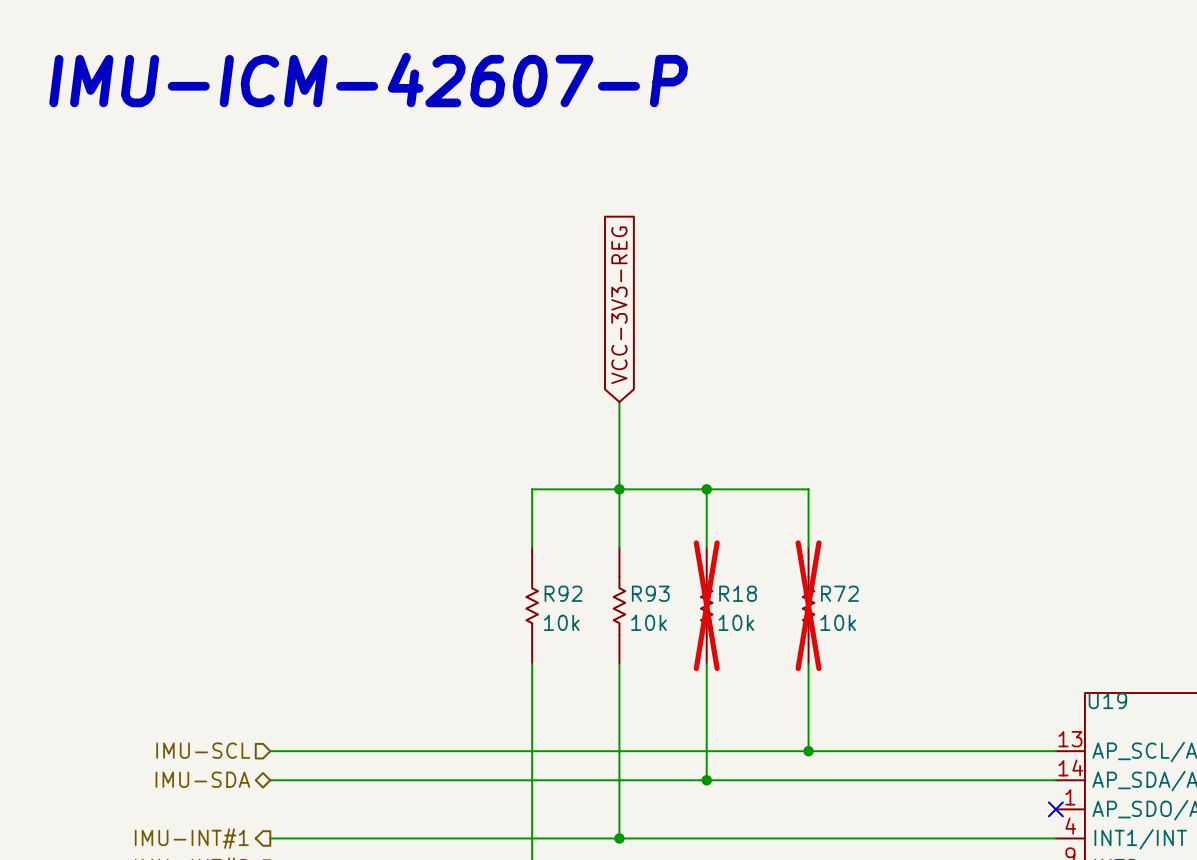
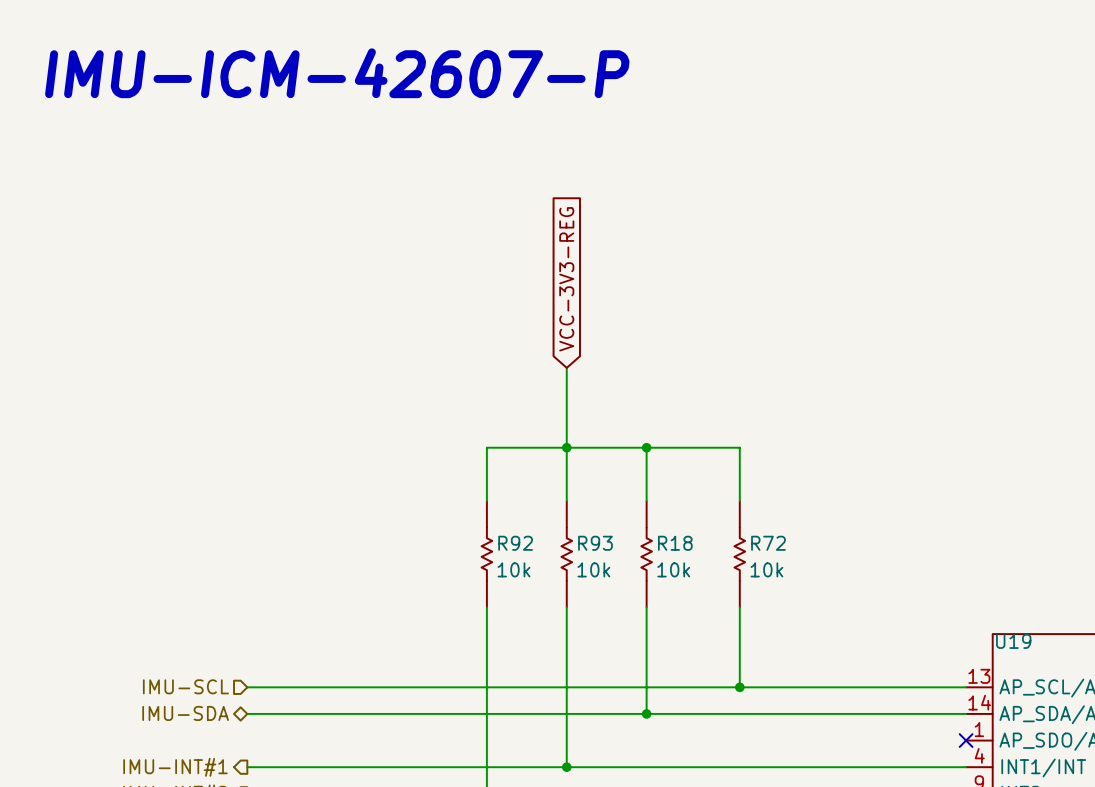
R18 do-not-place cross: (706, 605) -> none
R72 do-not-place cross: (808, 605) -> none

